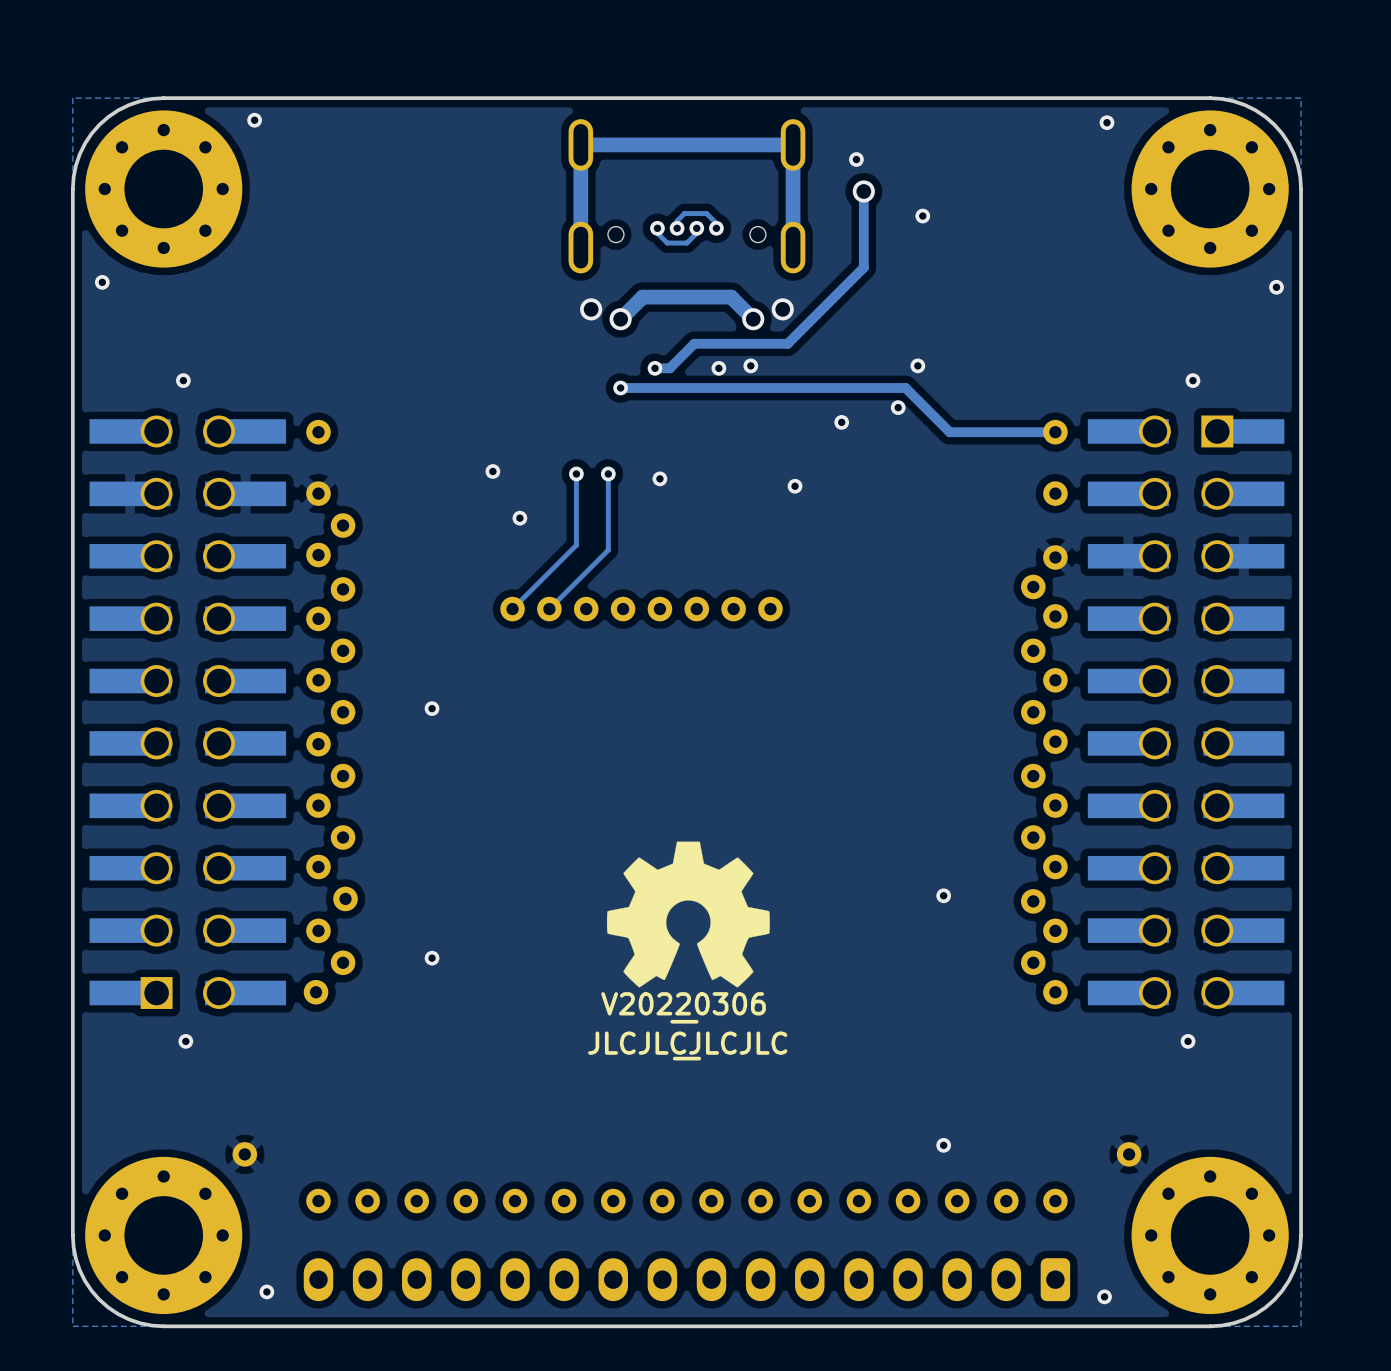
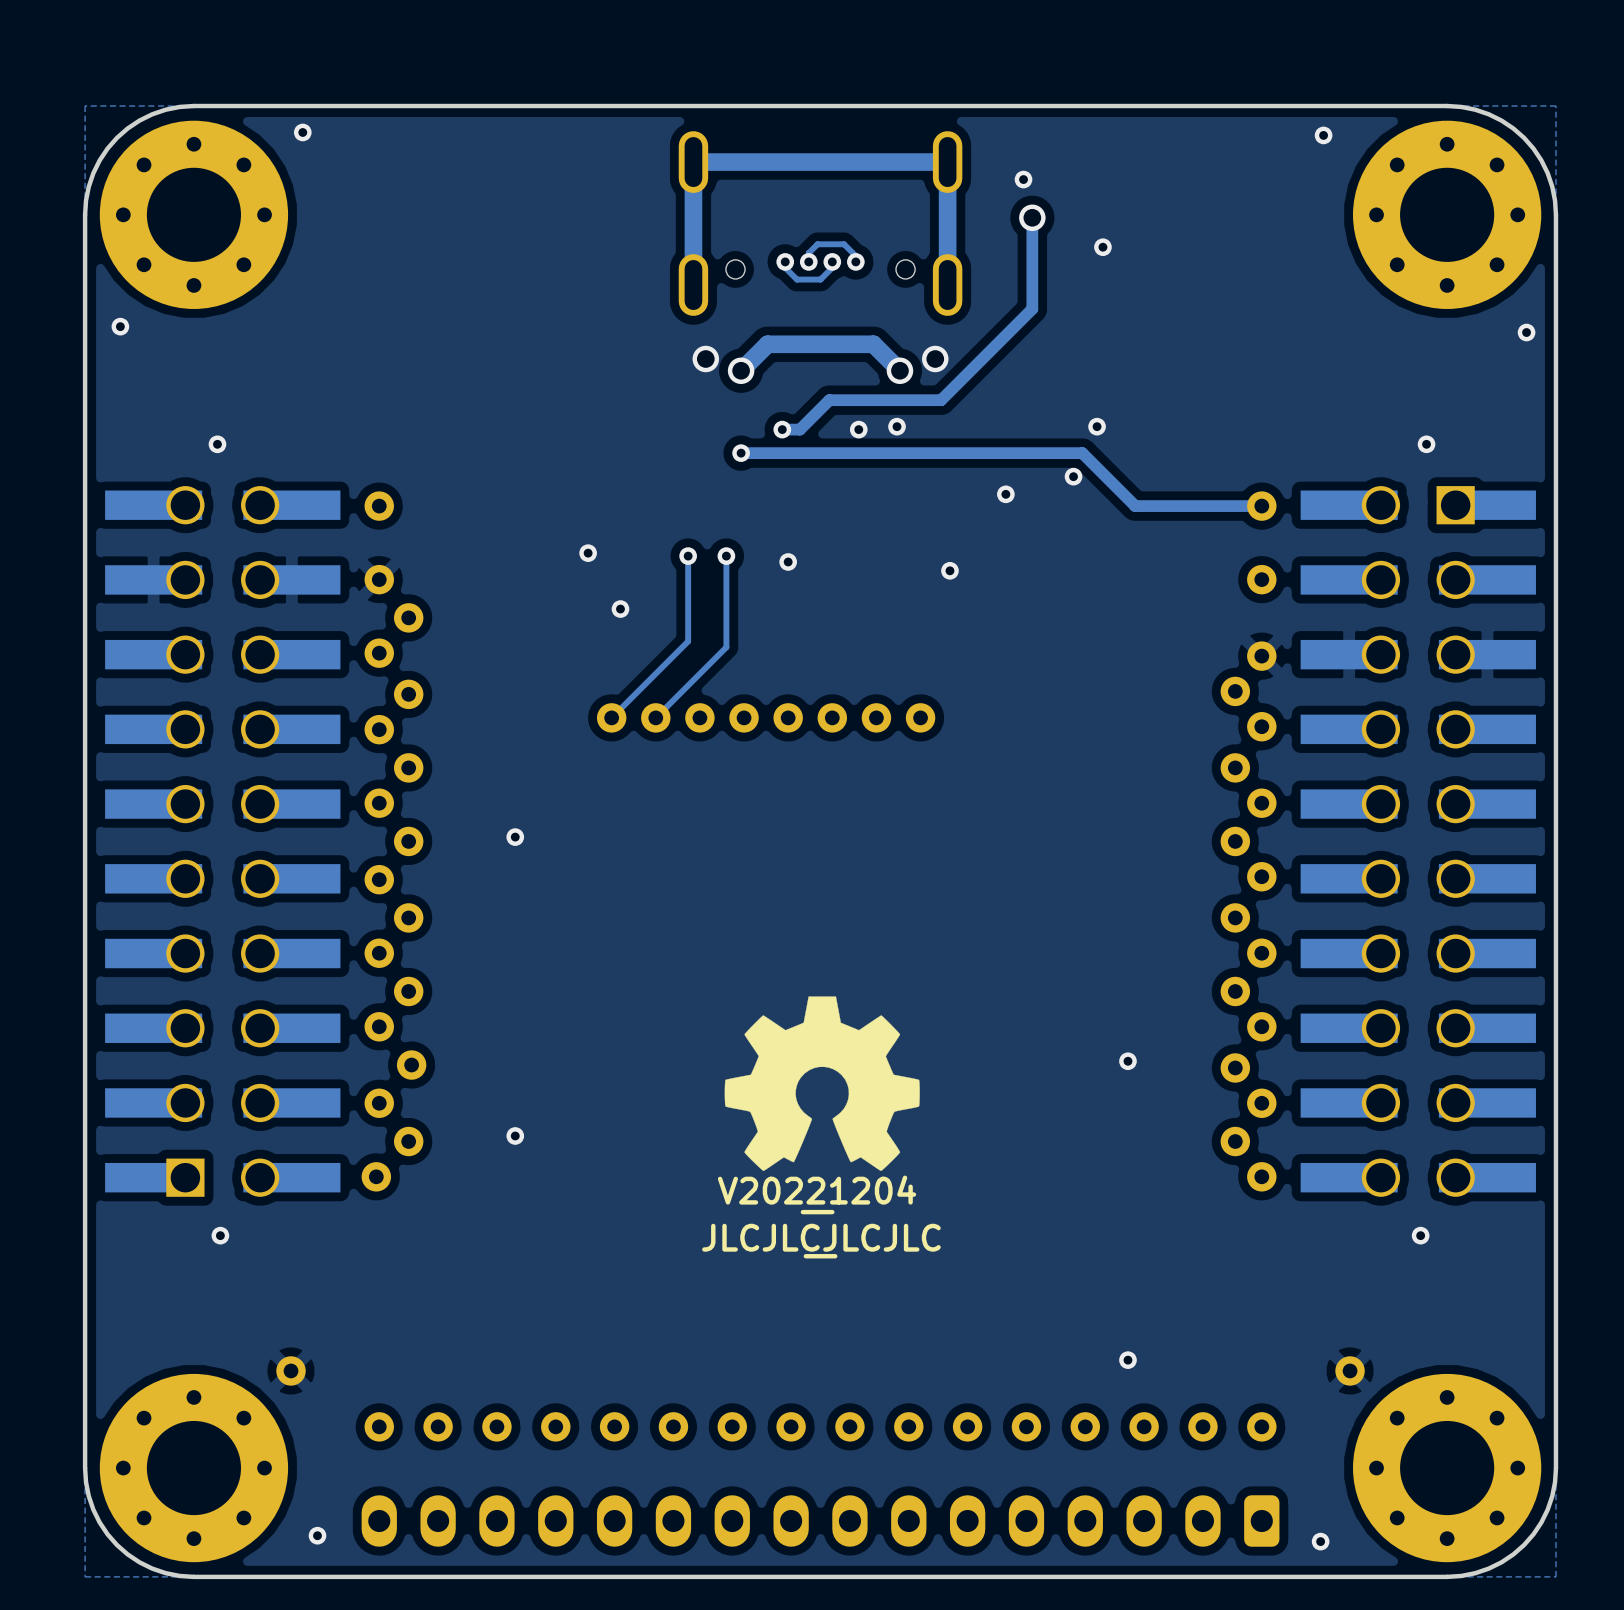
drawing shape: [601, 992, 766, 1024] -> [717, 1175, 917, 1215]

